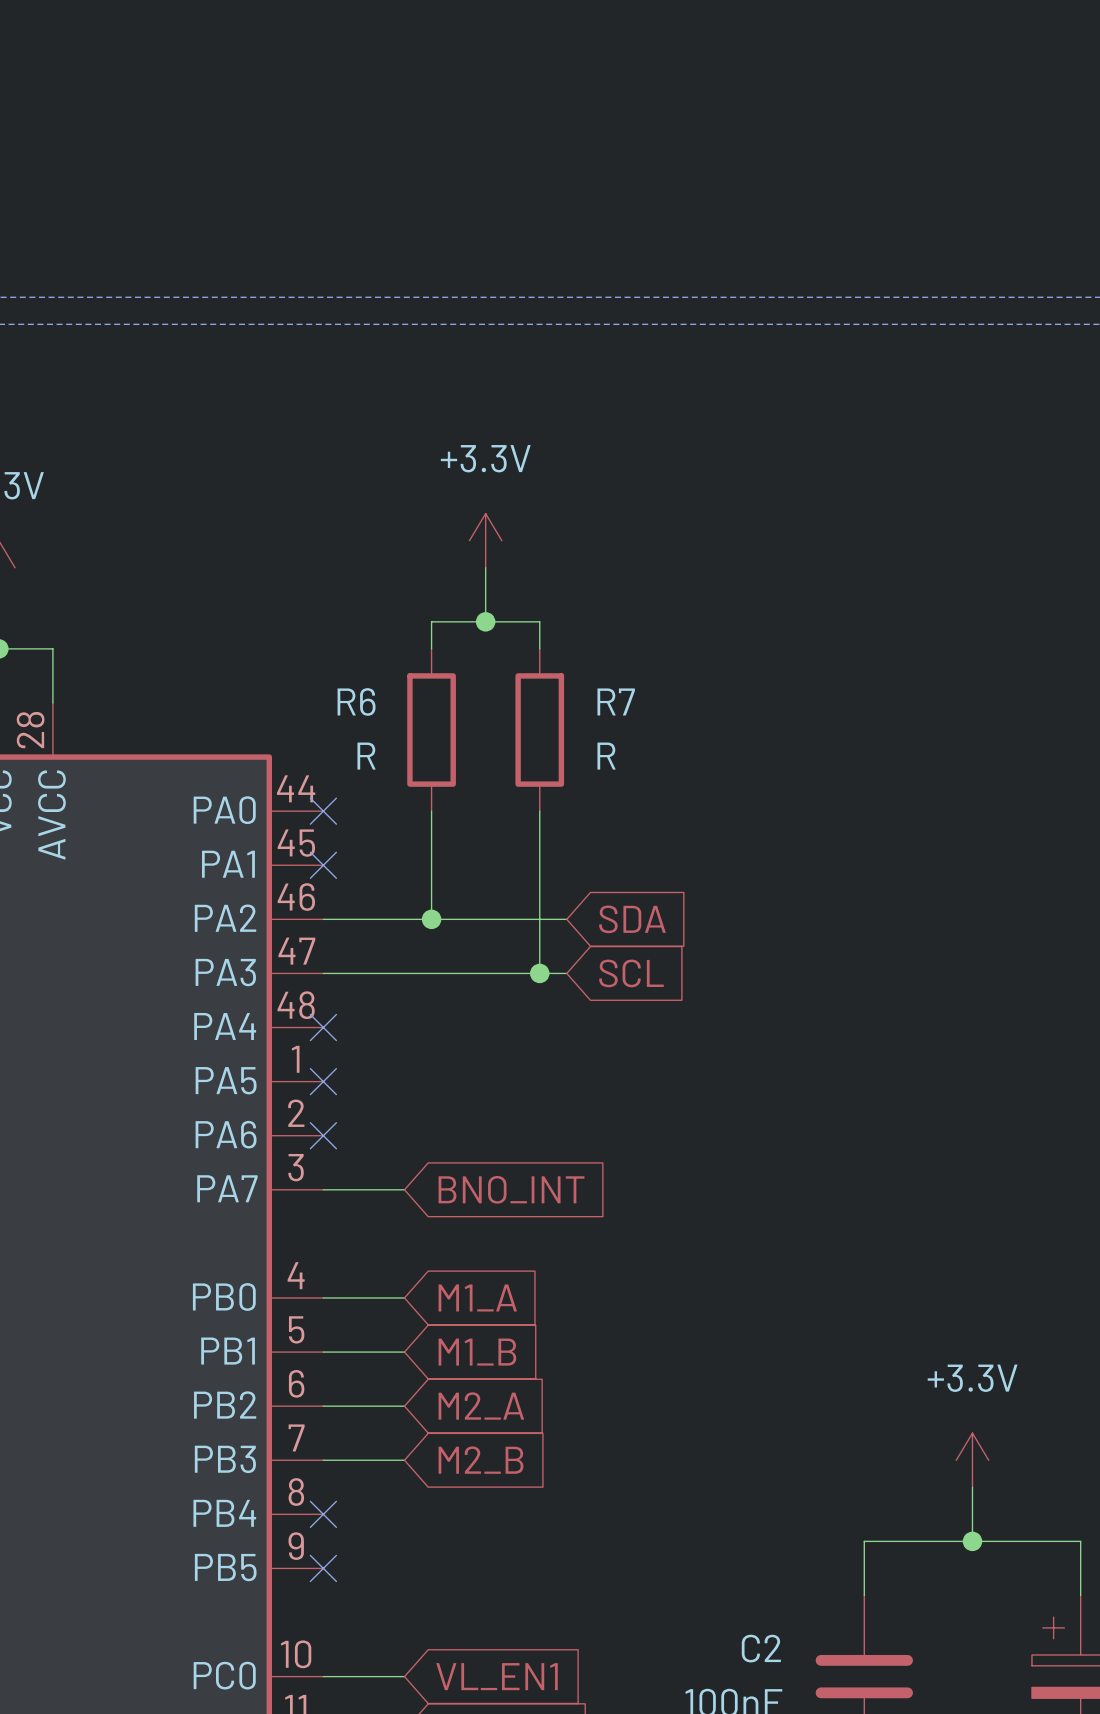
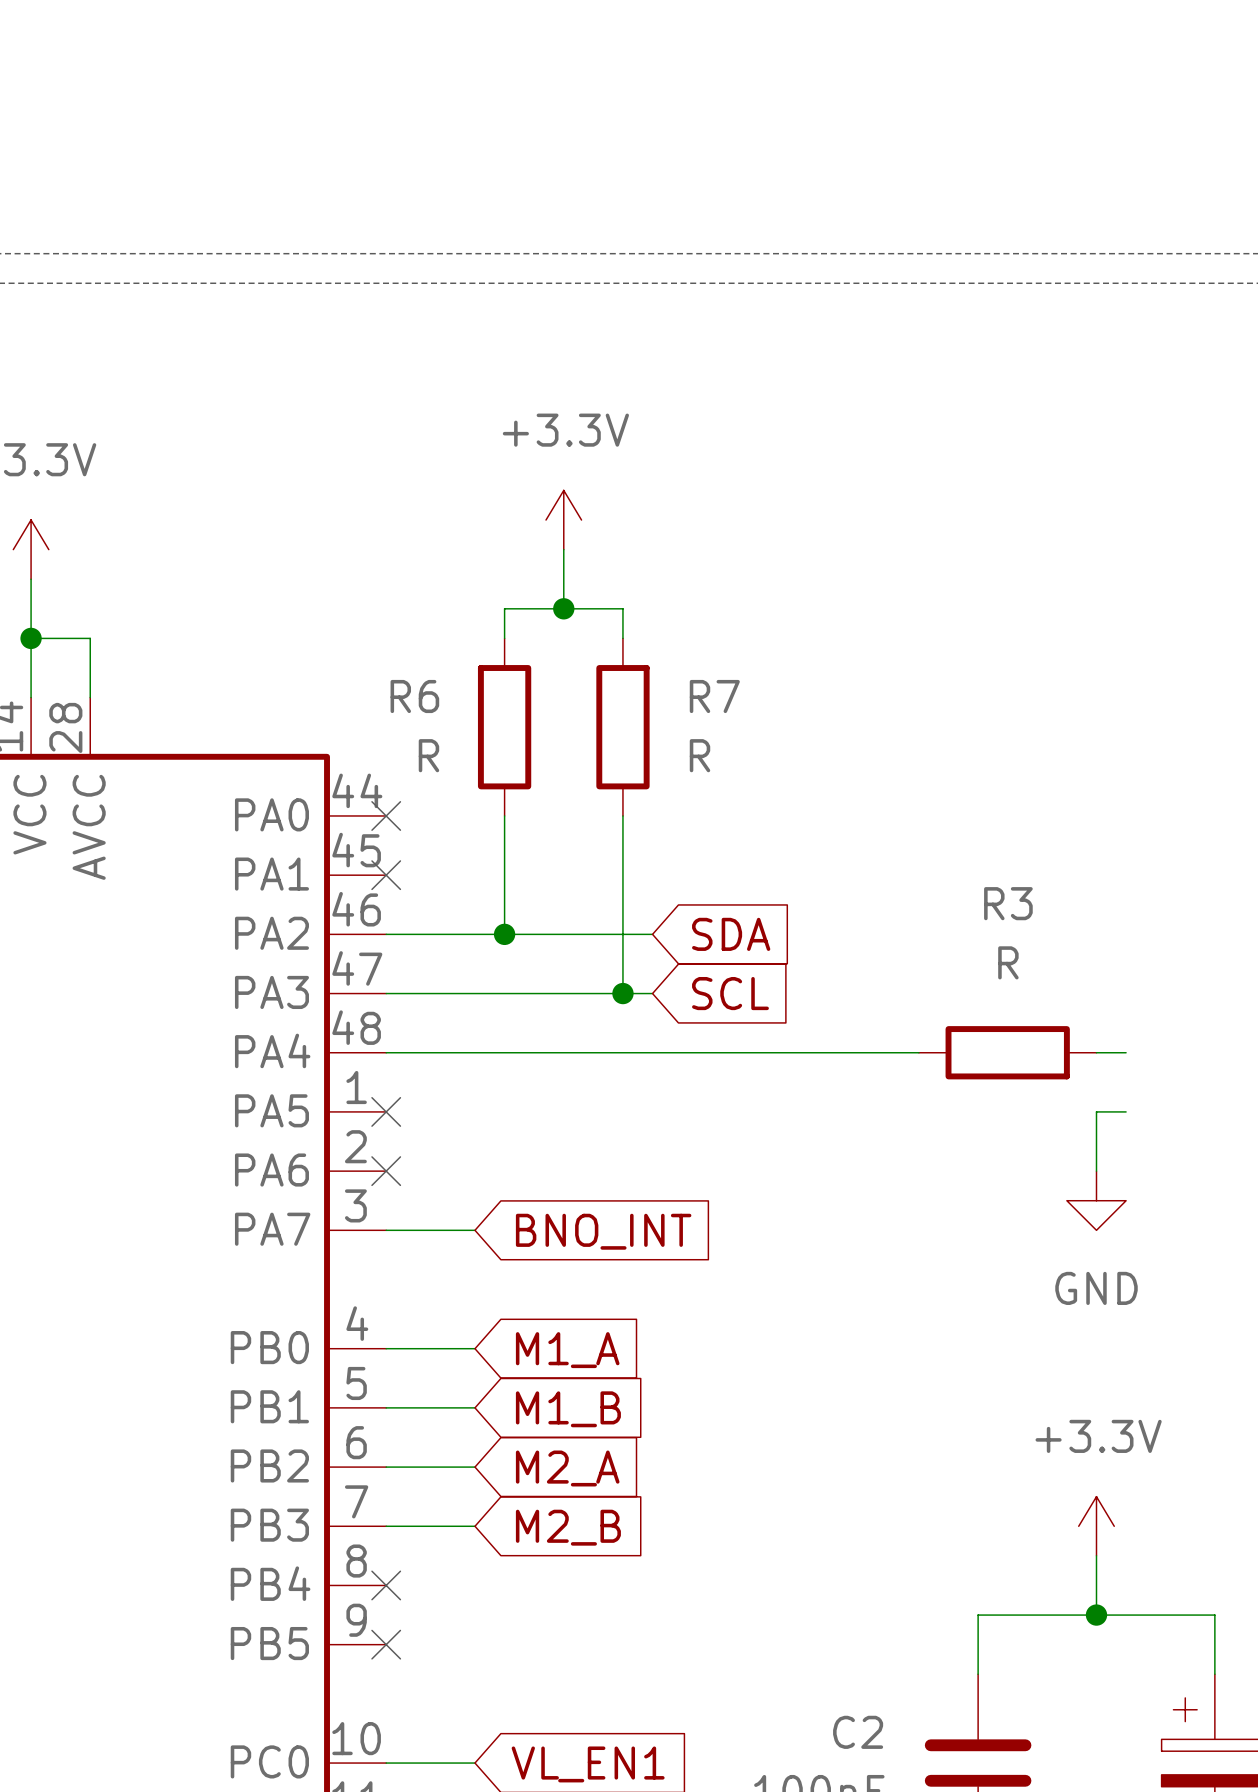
wire: none -> (386, 1052) (918, 1052)
no-connect mark: (323, 1027) -> none
R3: none -> R (1007, 1052)
wire: none -> (1096, 1052) (1126, 1052)
wire: none -> (1126, 1111) (1096, 1111) (1096, 1171)
power symbol: none -> GND (1096, 1200)

